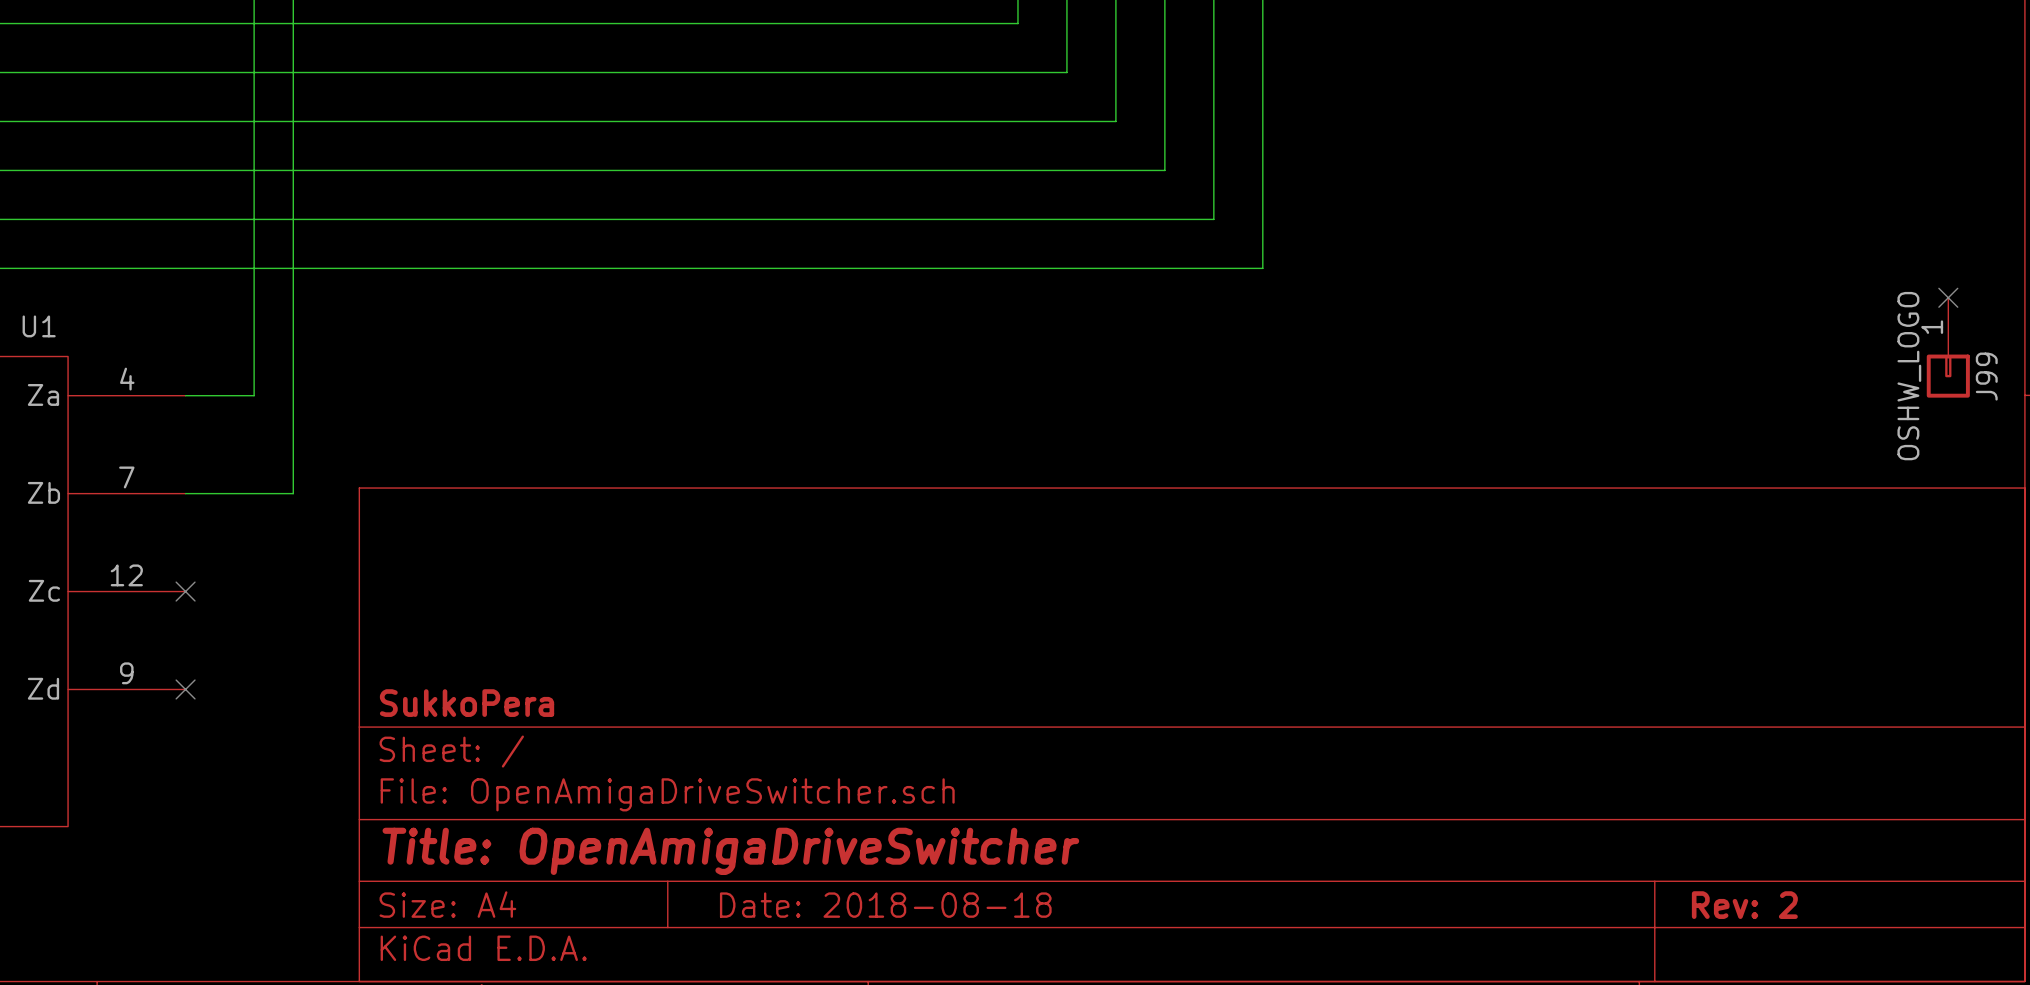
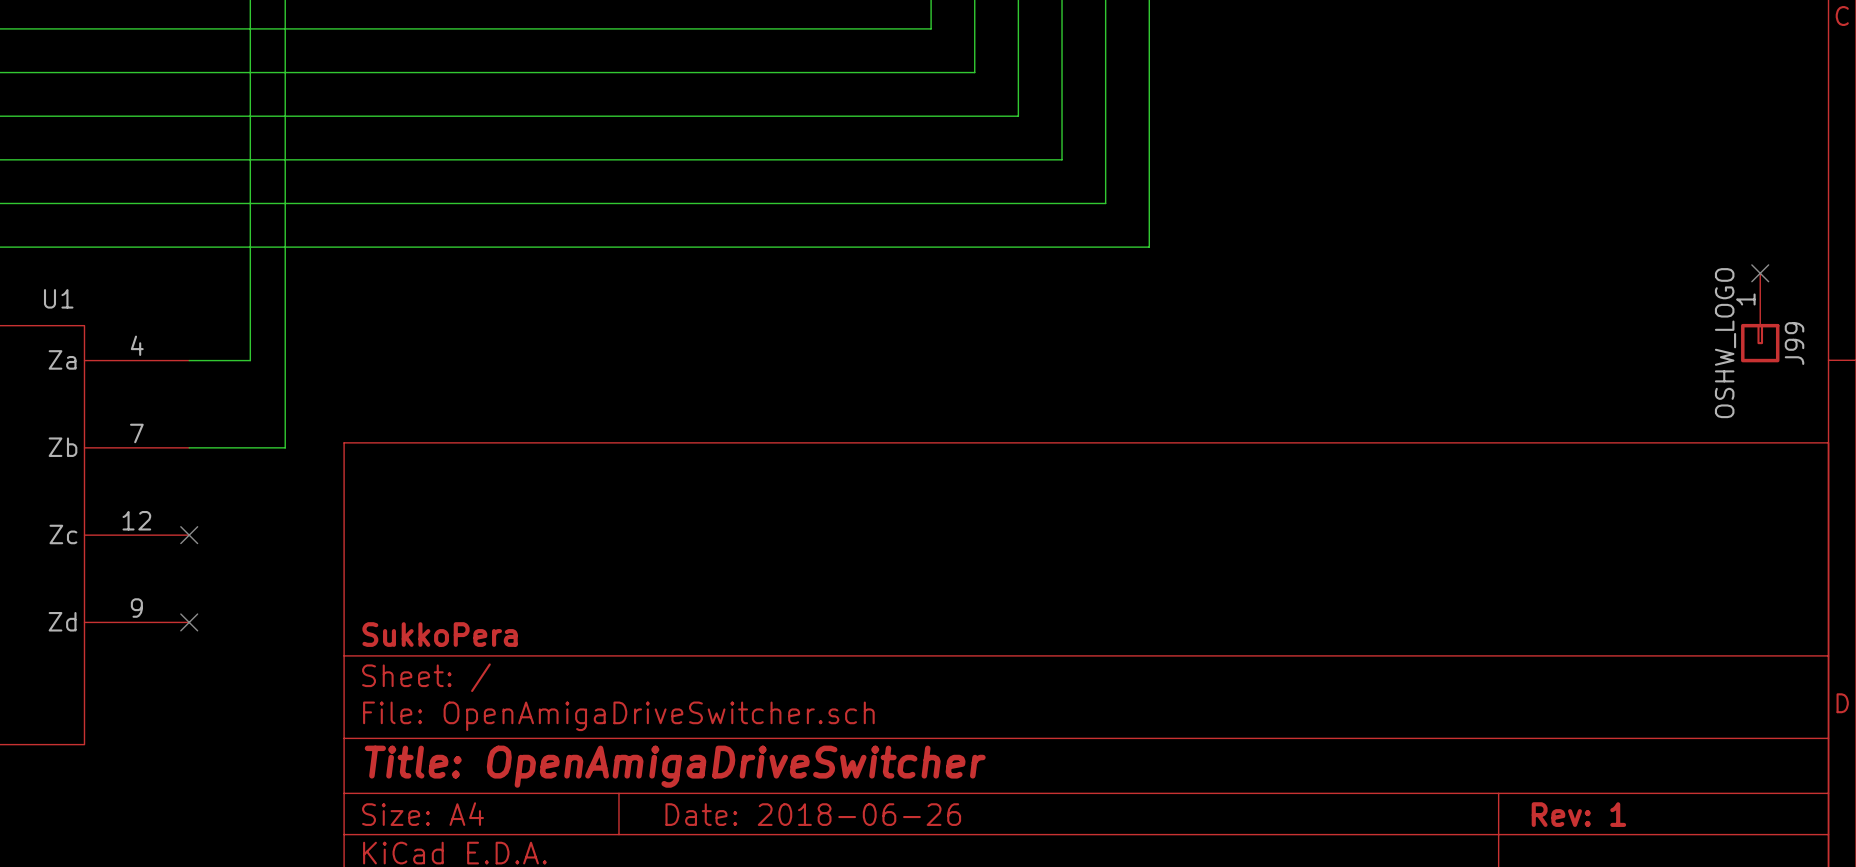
title block: Date: 2018-08-18 (885, 905) -> Date: 2018-06-26 (813, 814)
title block: Rev: 2 (1744, 905) -> Rev: 1 (1578, 814)

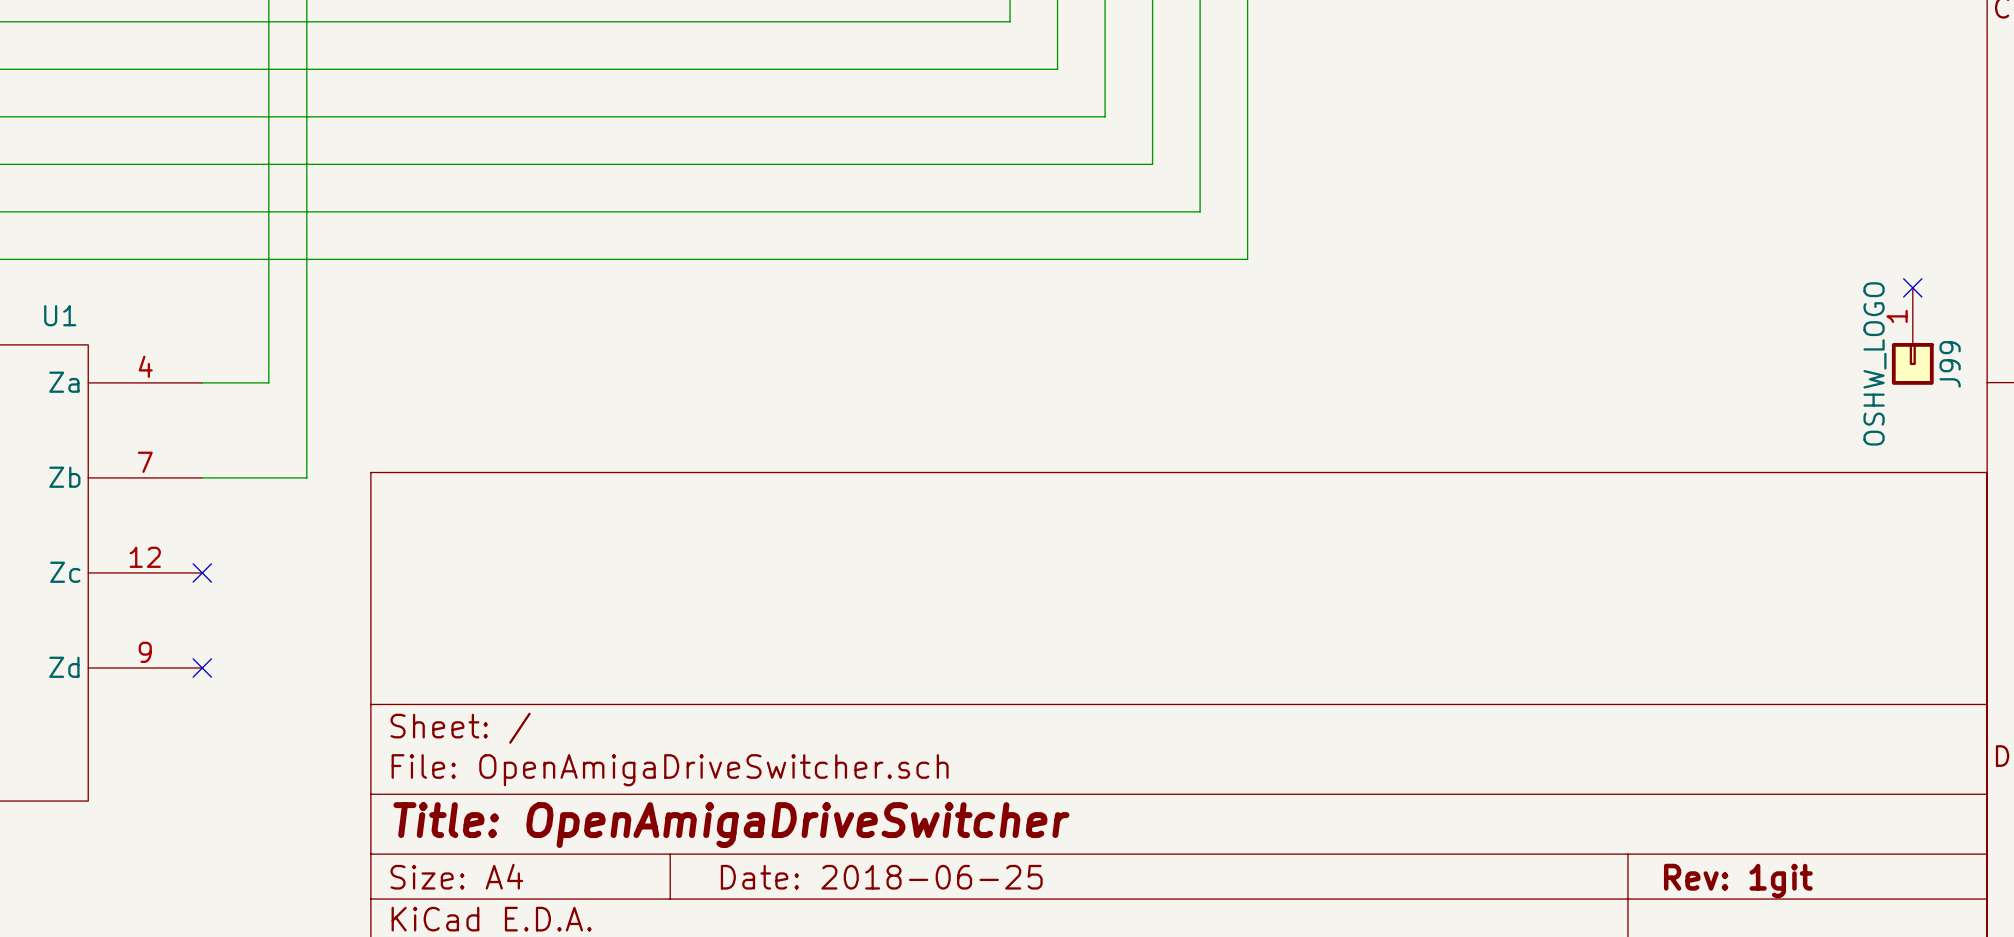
title block: SukkoPera (440, 634) -> none
title block: Date: 2018-06-26 (813, 814) -> Date: 2018-06-25 (881, 877)
title block: Rev: 1 (1578, 814) -> Rev: 1git (1738, 880)

